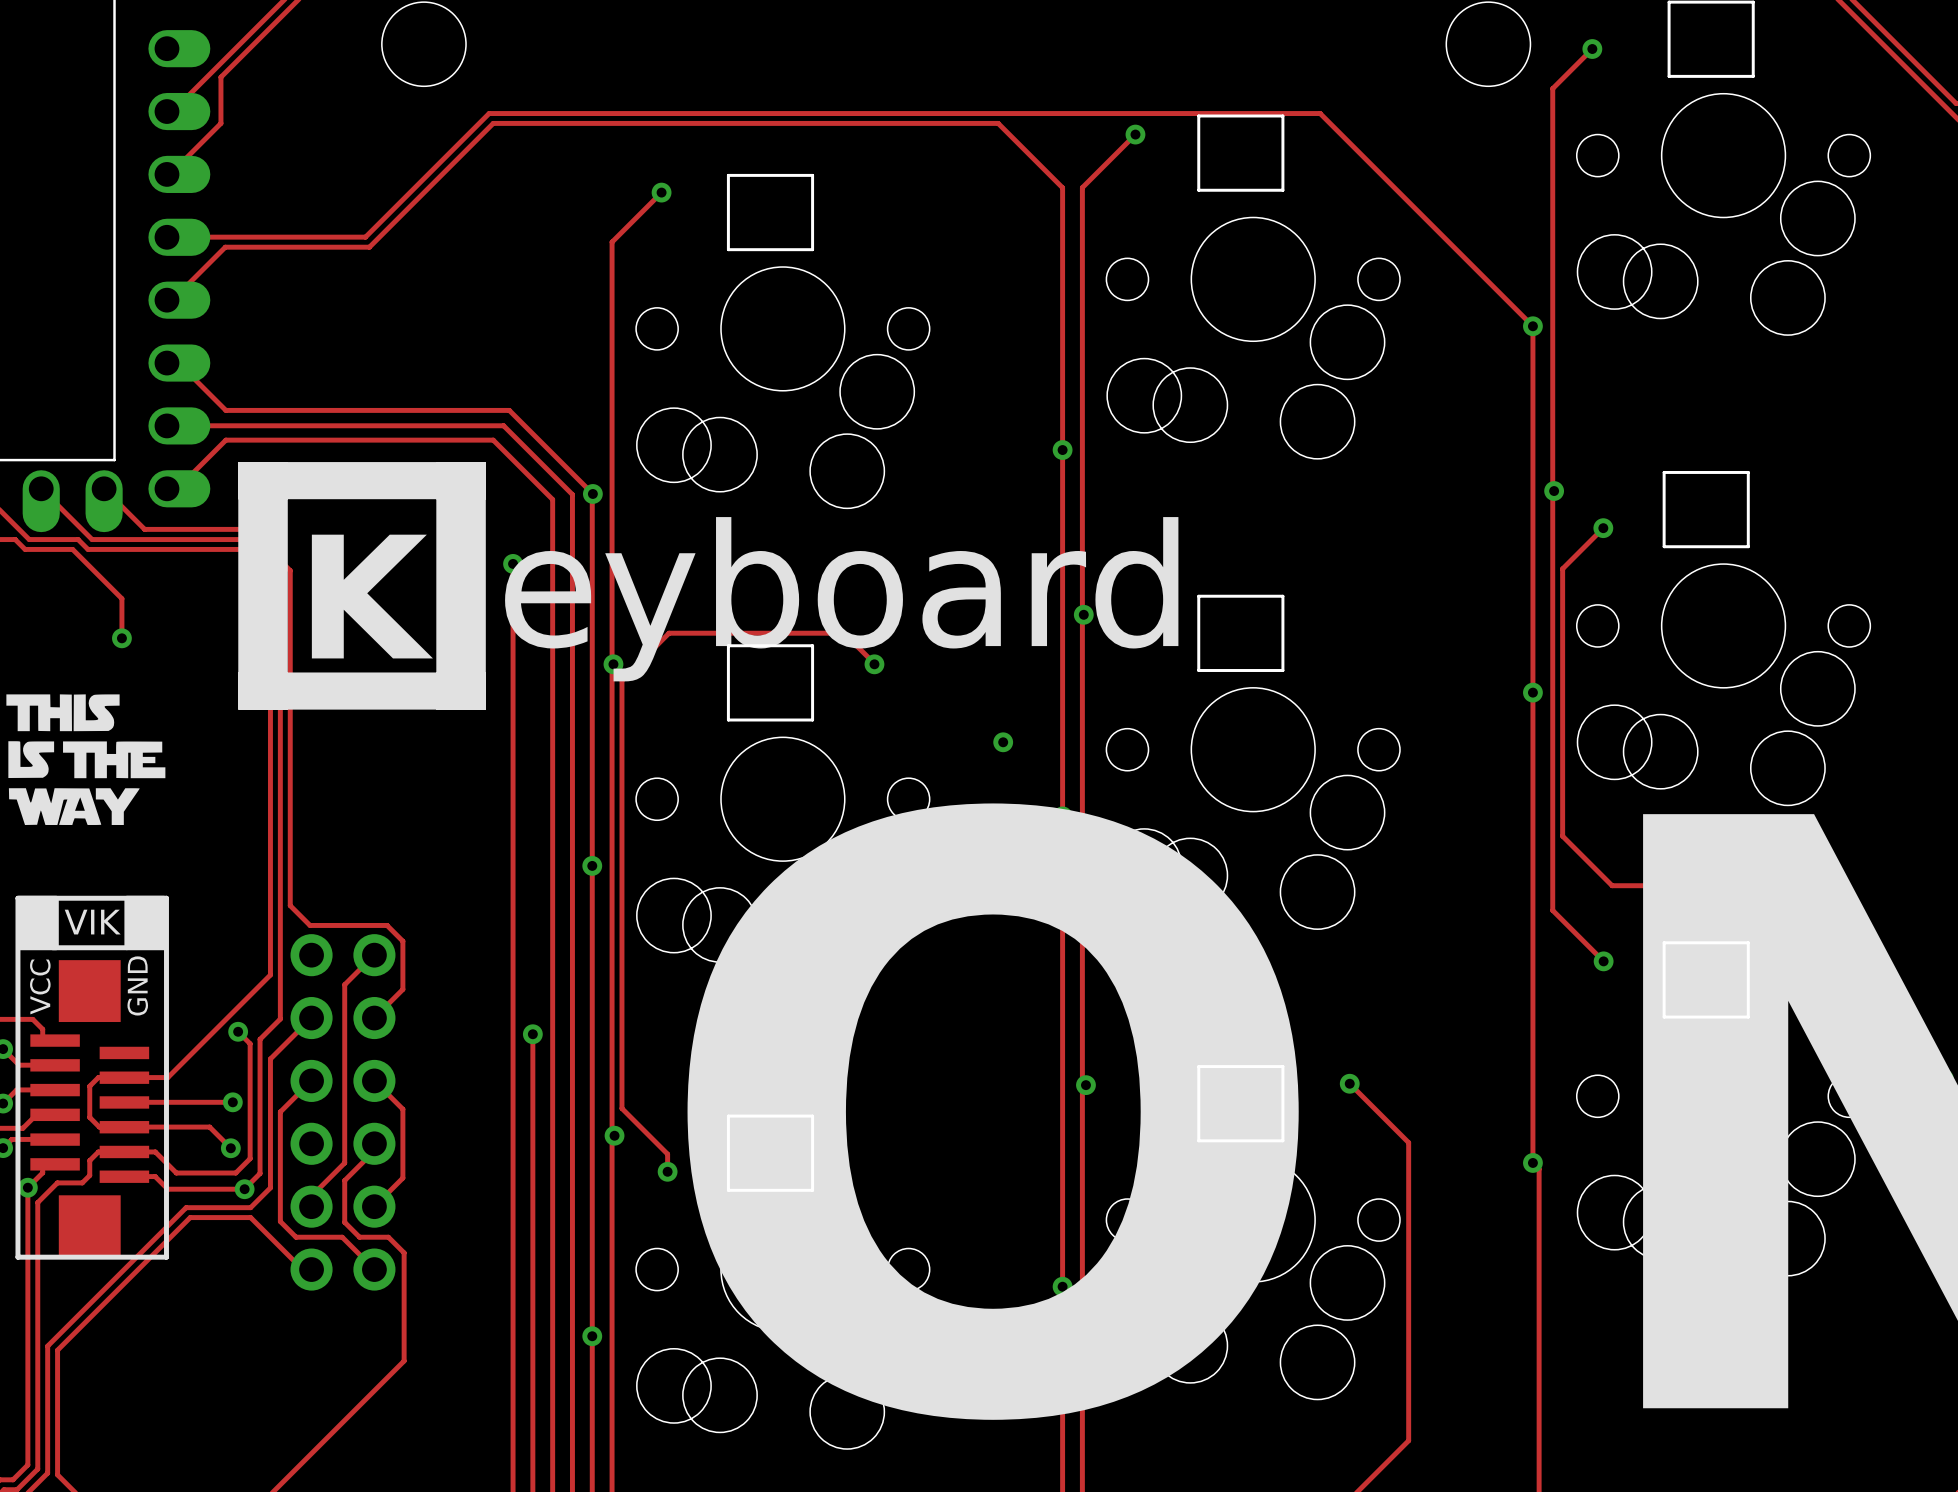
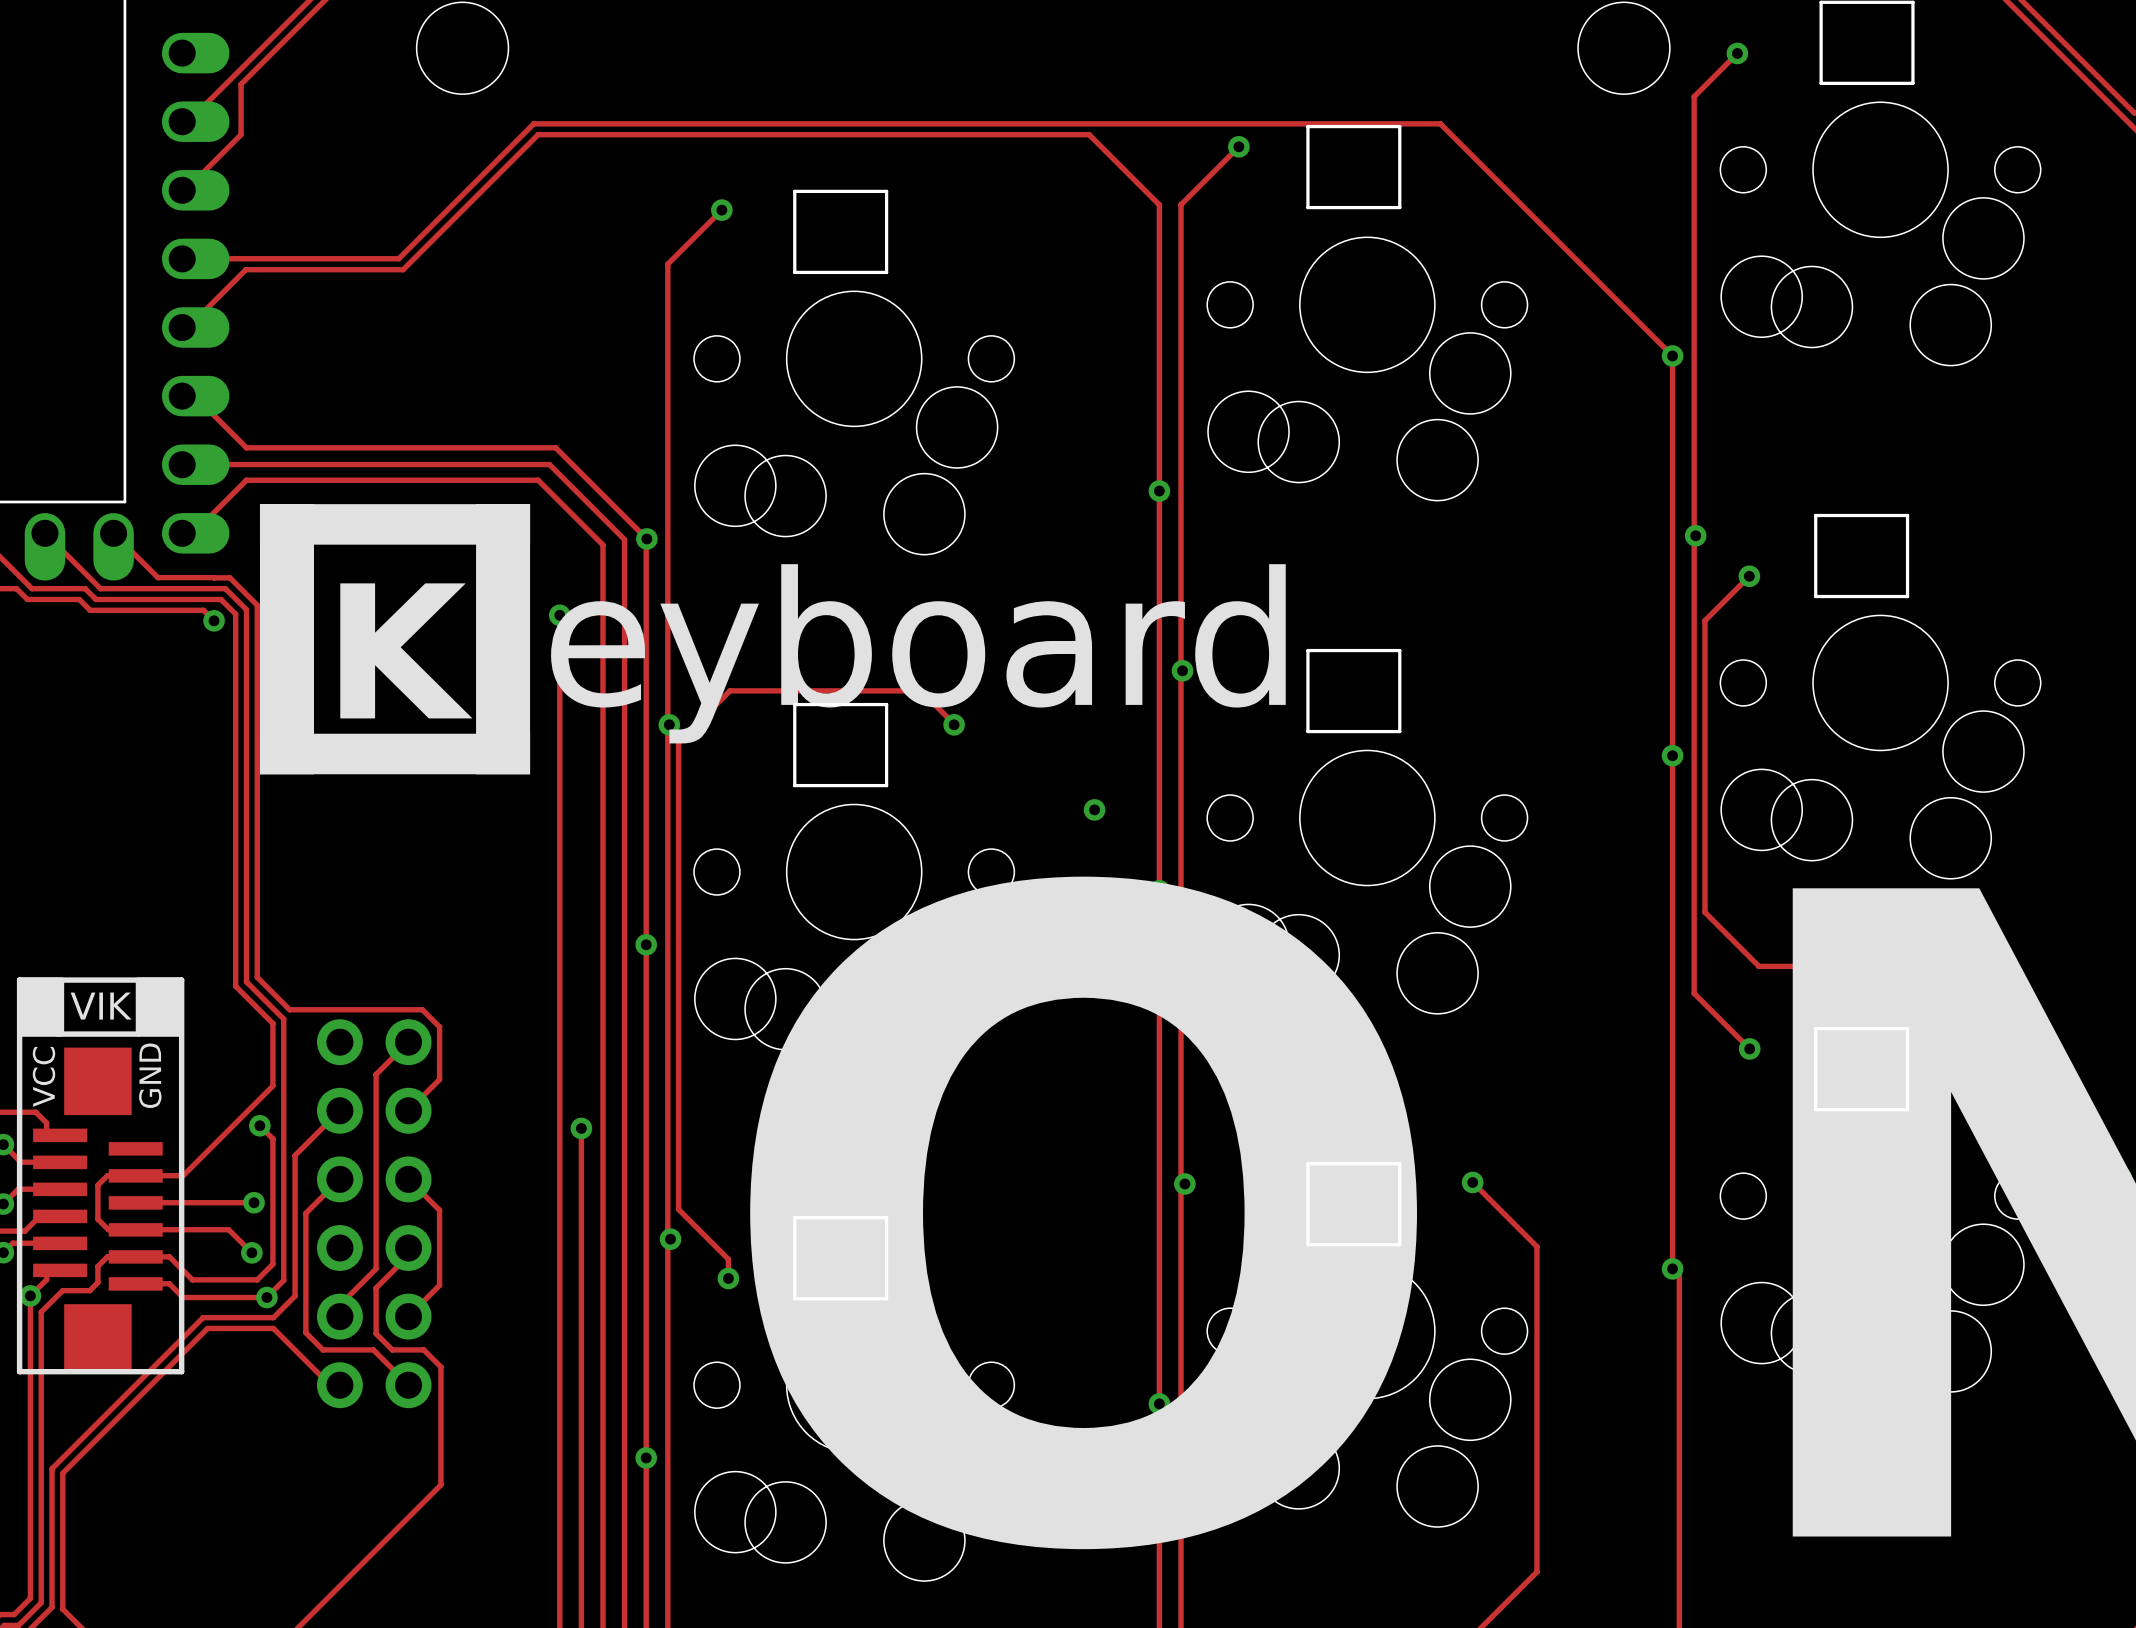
track: (196, 529) (248, 529) (290, 570) (290, 905) (310, 925) -> (214, 577) (229, 577) (257, 605) (257, 977) (289, 1009) (338, 1009)
track: (206, 539) (245, 539) (280, 574) (280, 1019) (260, 1039) -> (225, 588) (246, 609) (246, 981) (283, 1019) (283, 1134)
track: (202, 549) (241, 549) (270, 578) (270, 974) (250, 995) -> (221, 599) (235, 614) (235, 986) (272, 1023) (272, 1085)
track: (82, 559) (121, 598) (121, 638) -> (90, 610) (203, 610) (214, 620)
via position: (121, 638) -> (214, 620)
drawing: [6, 694, 166, 826] -> none

